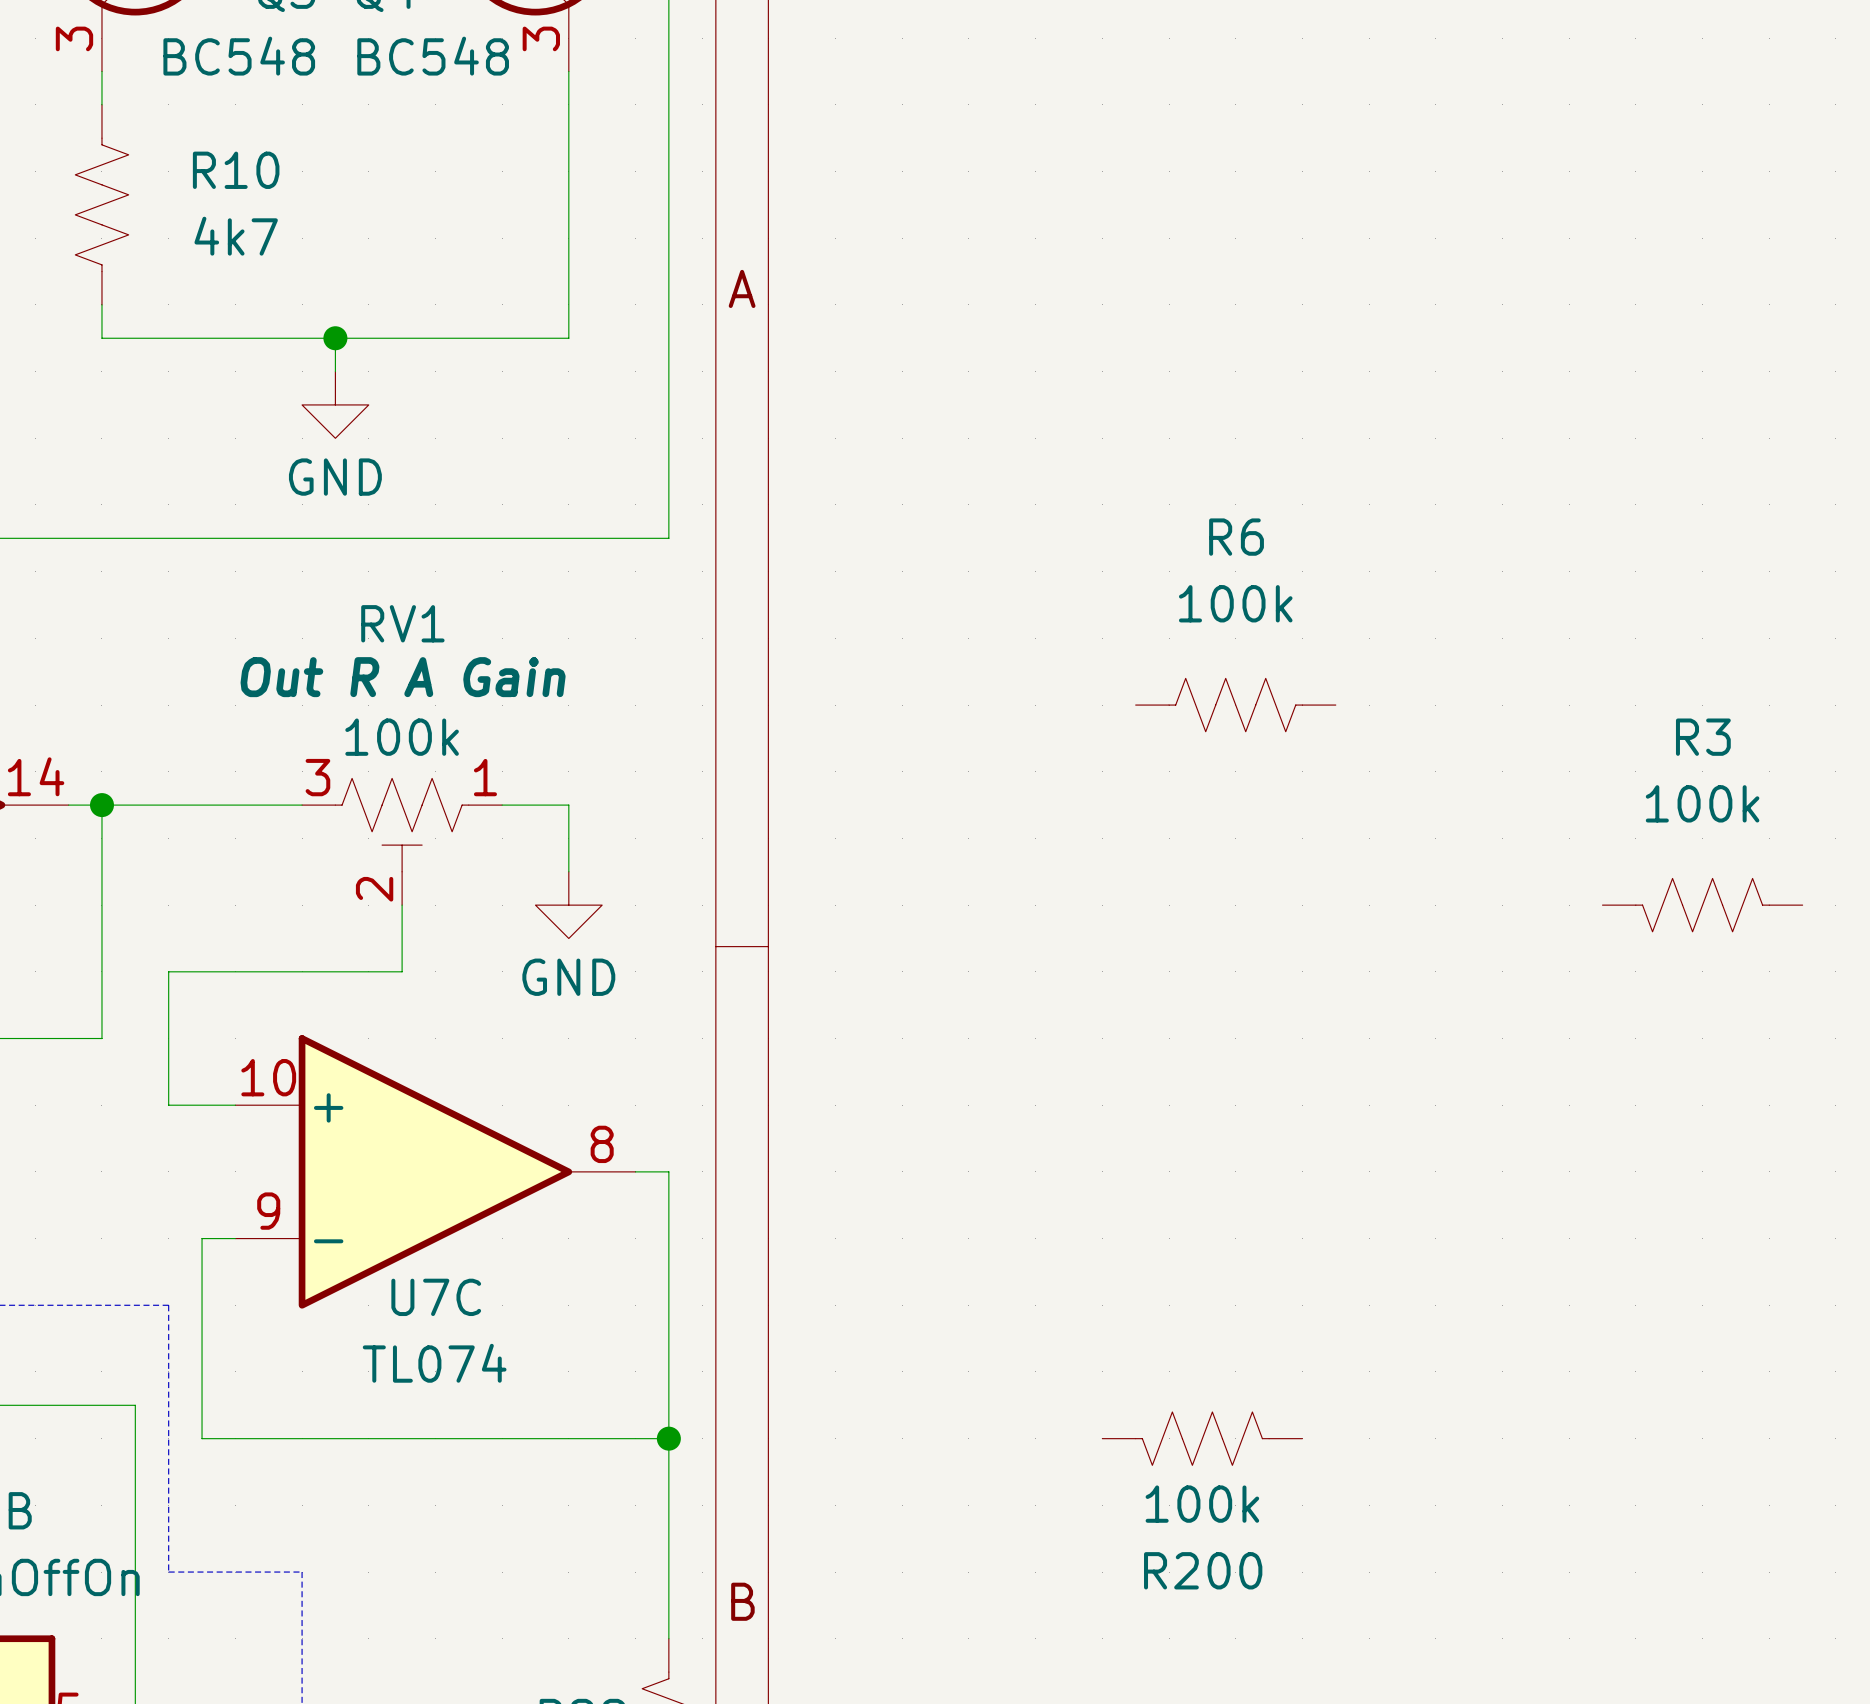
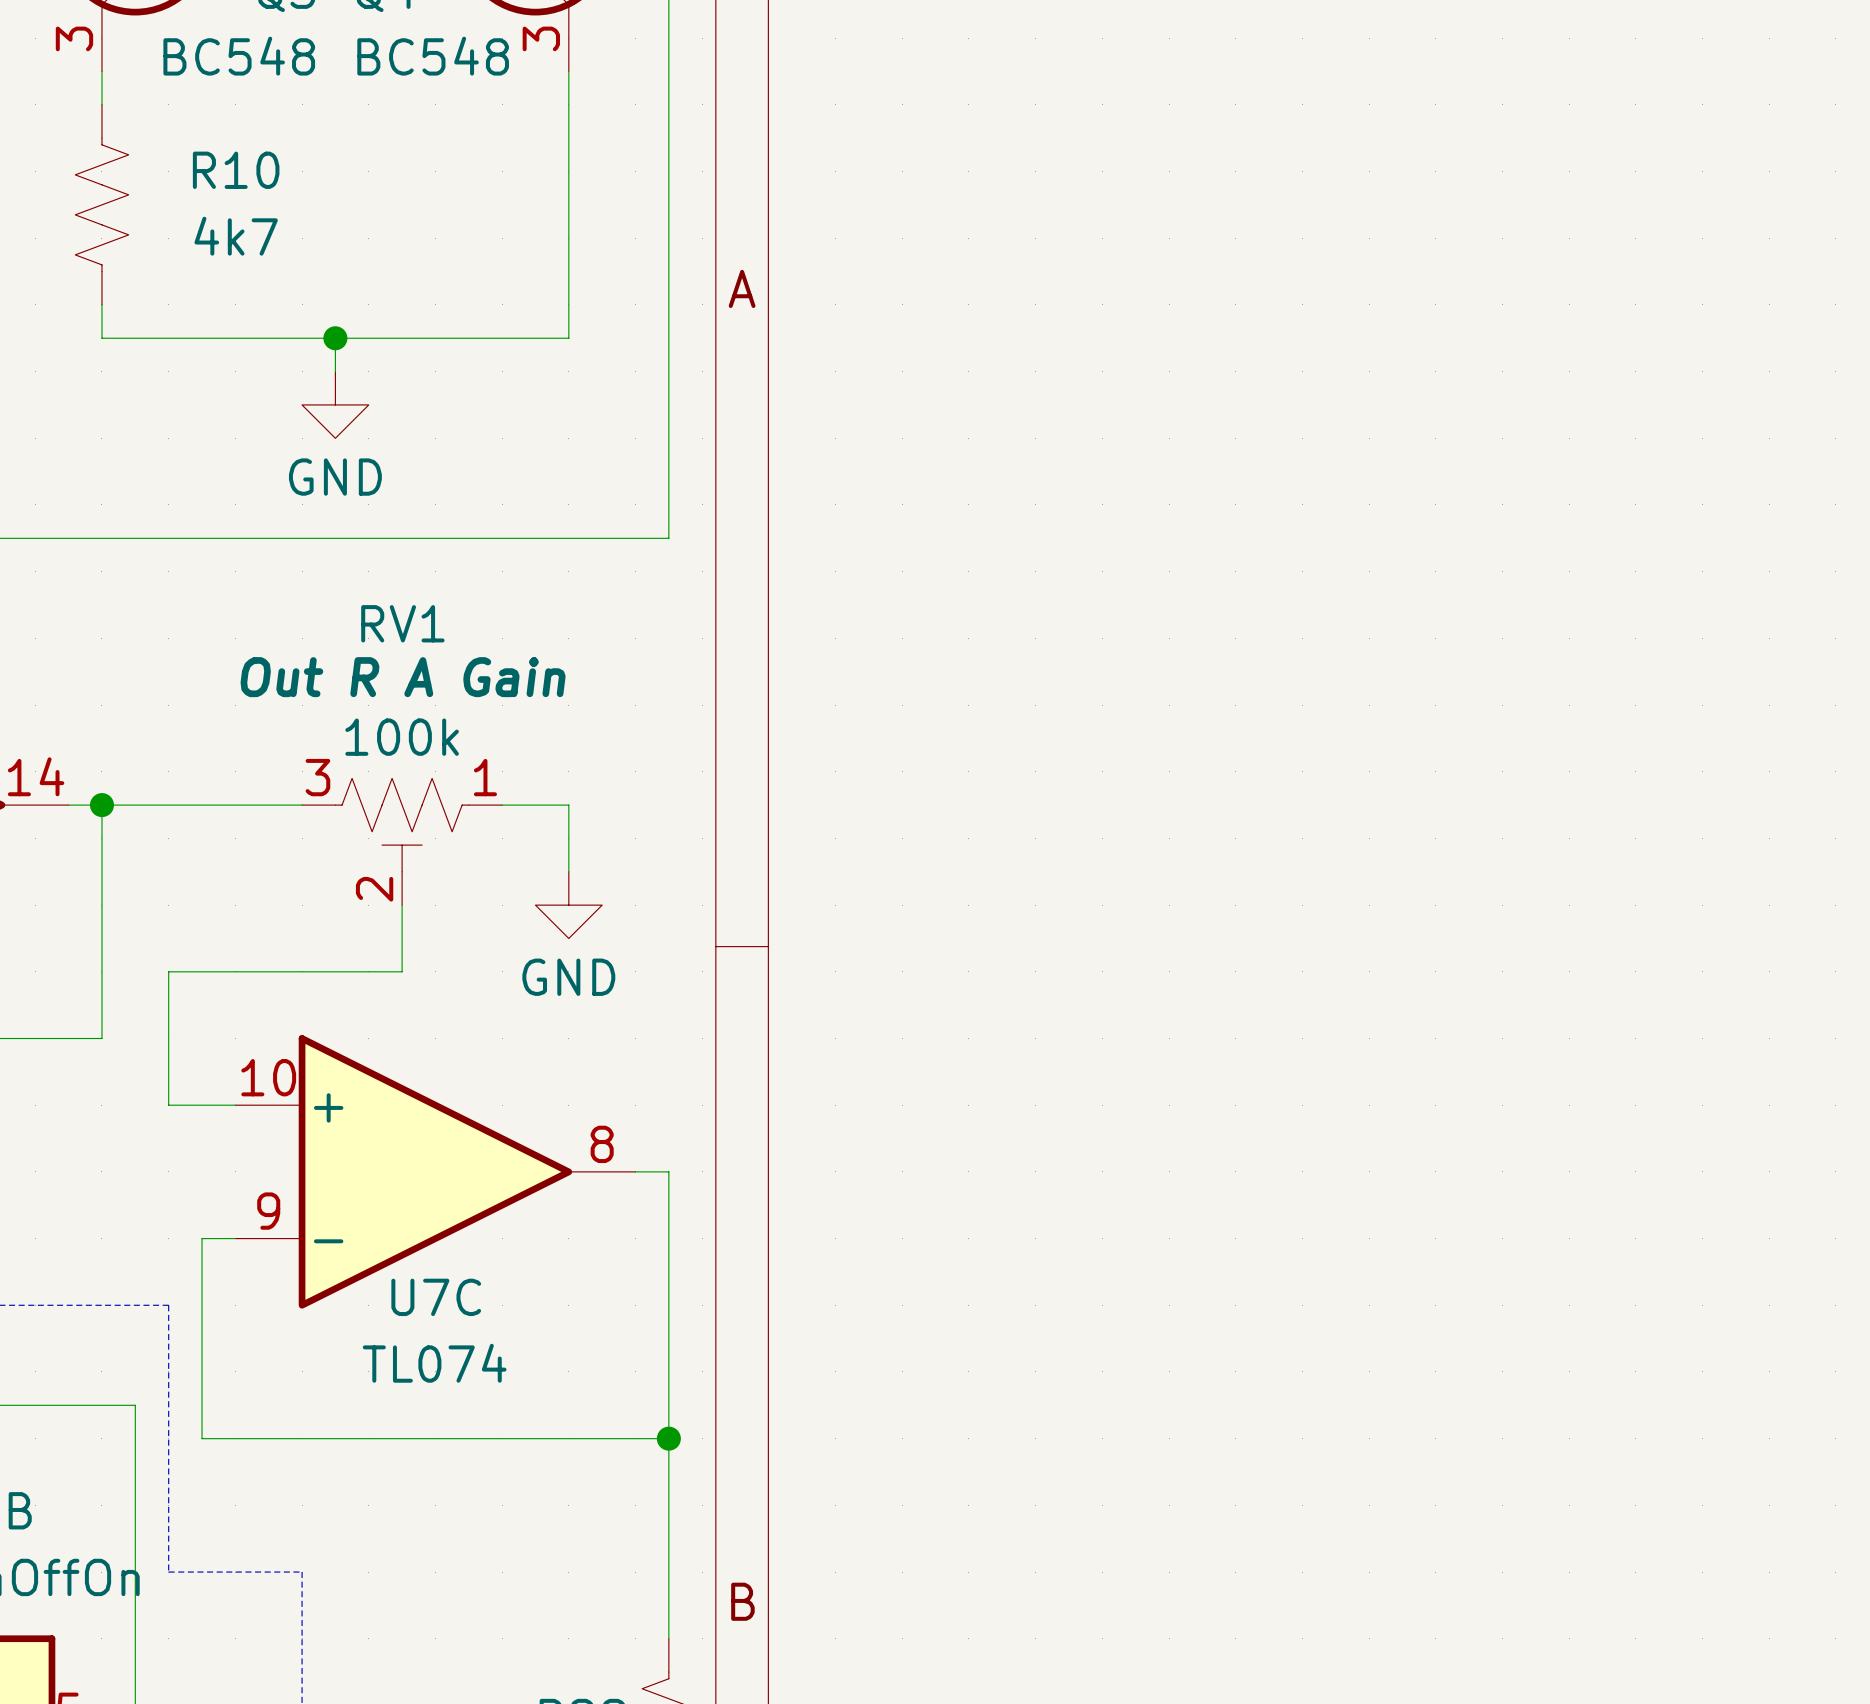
R6: 100k (1235, 705) -> none
R3: 100k (1702, 905) -> none
R200: 100k (1202, 1438) -> none

